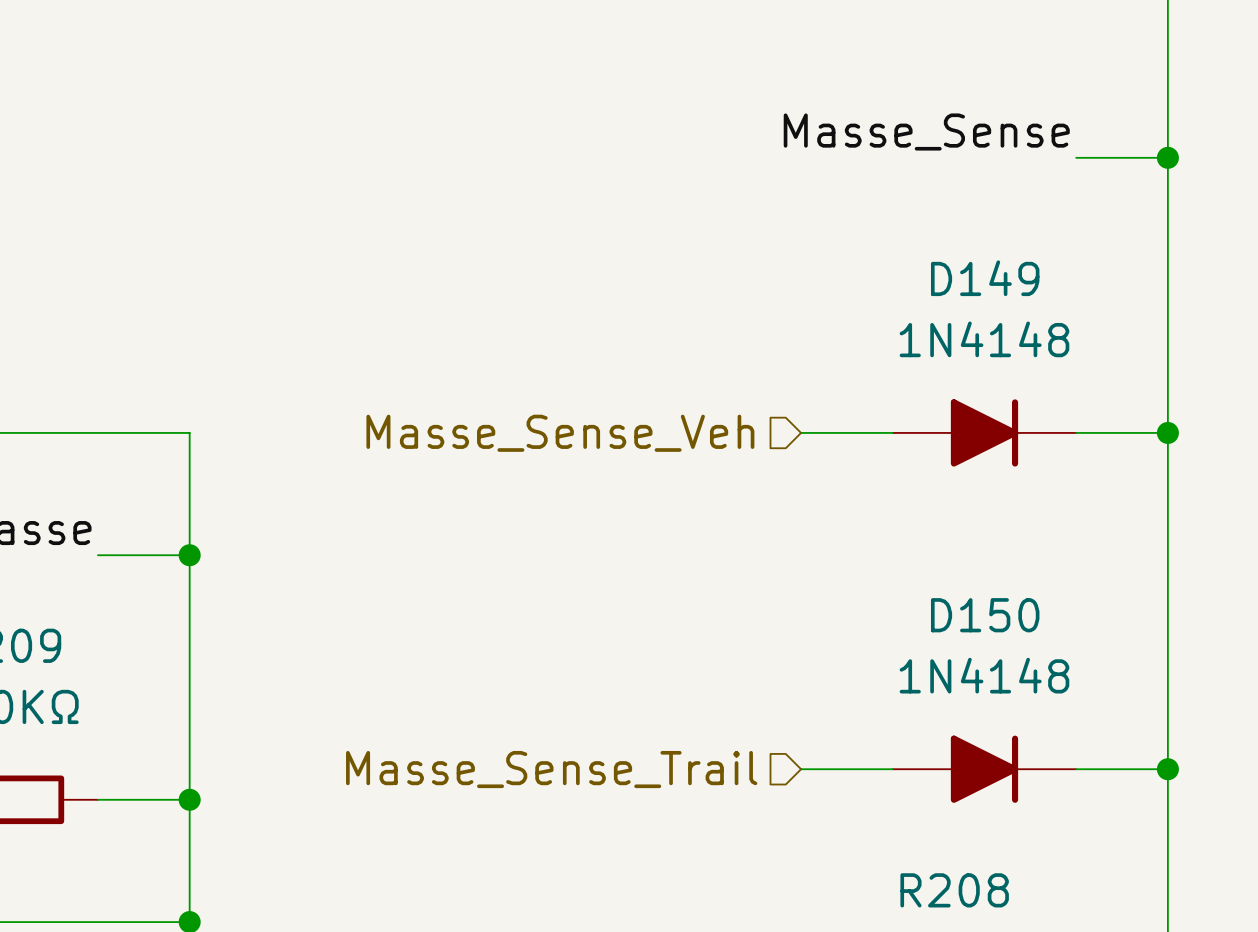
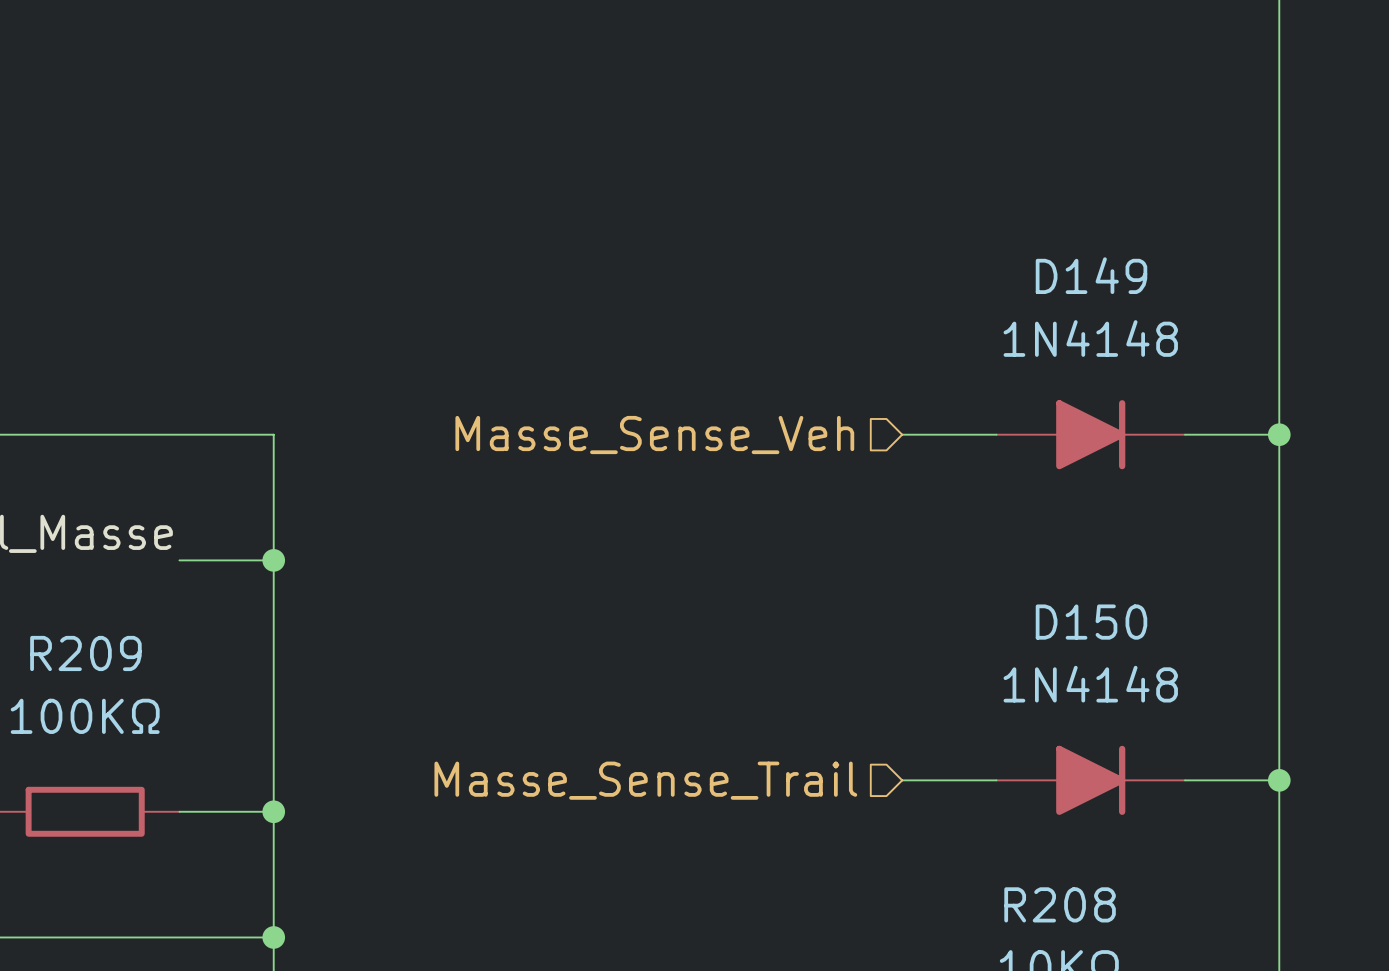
label: Masse_Sense (926, 132) -> none
wire: (1076, 157) (1167, 157) -> none
junction: (1167, 157) -> none

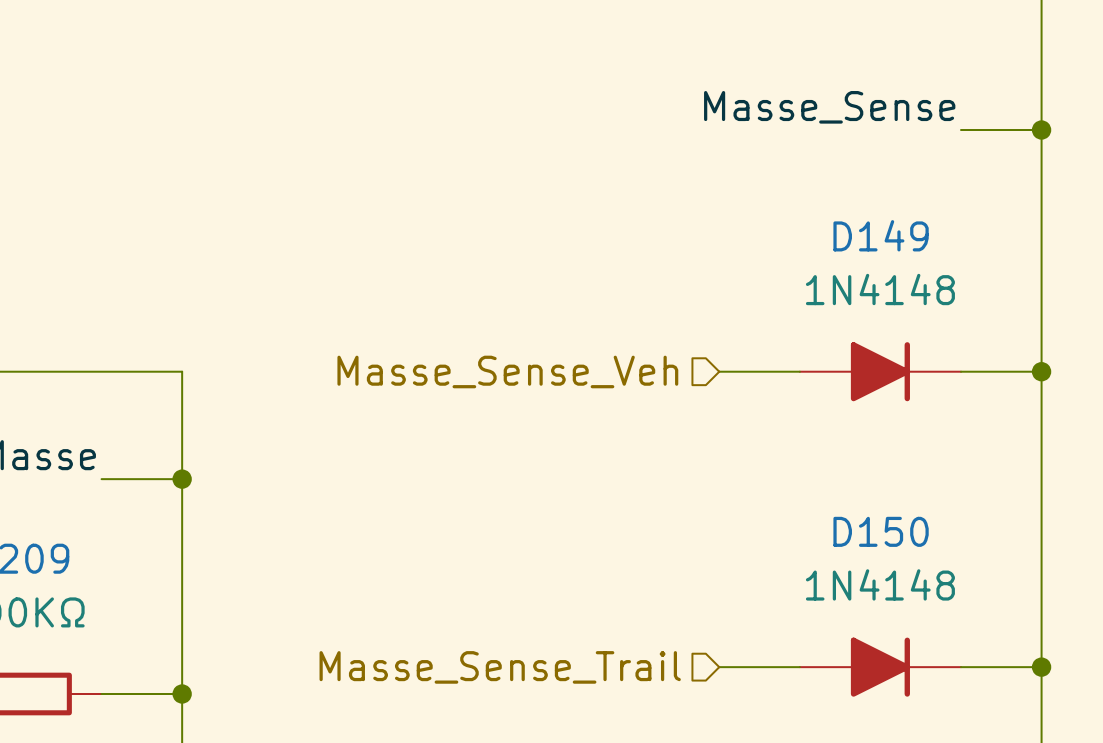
label: none -> Masse_Sense (829, 107)
wire: none -> (961, 130) (1041, 130)
junction: none -> (1041, 130)

